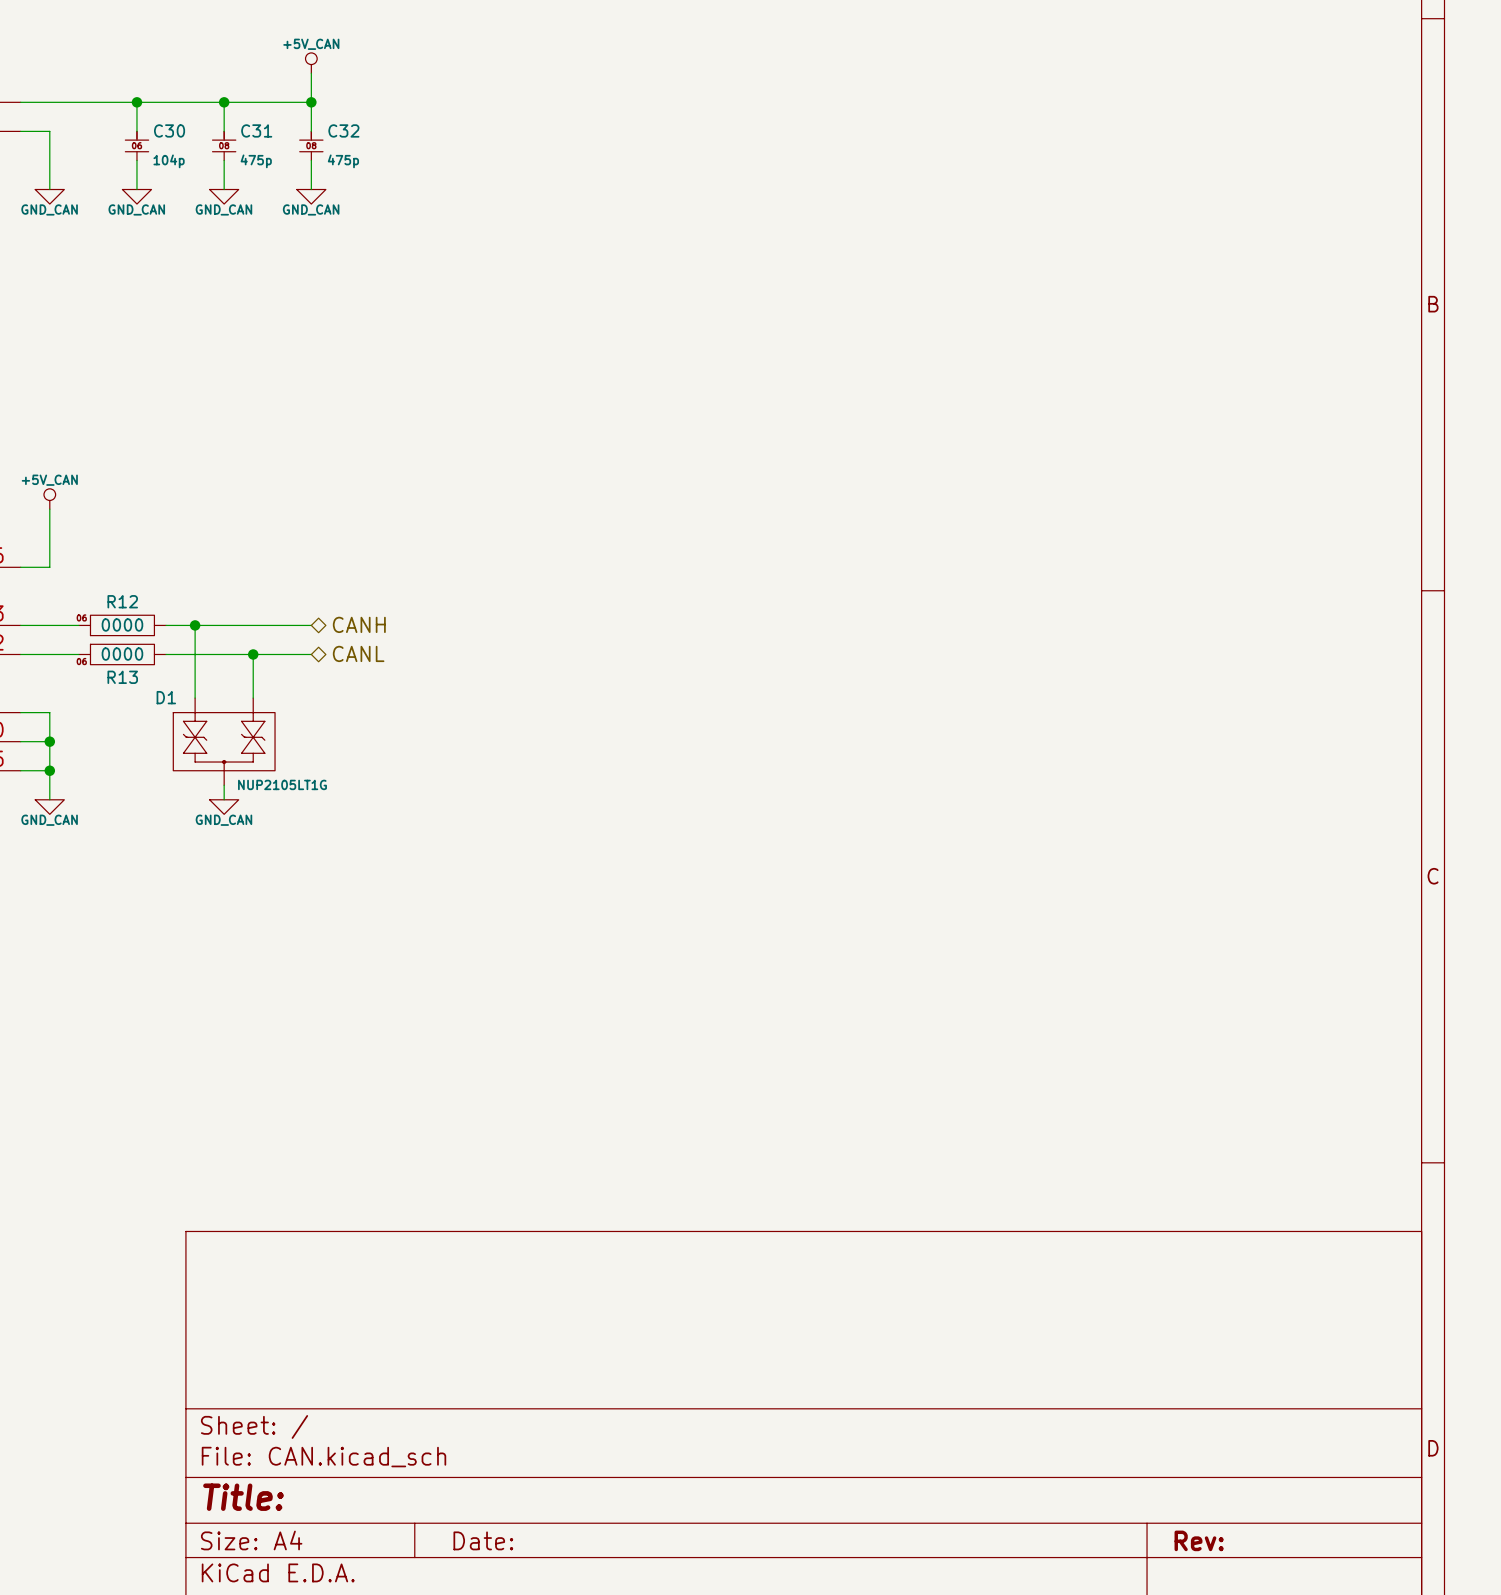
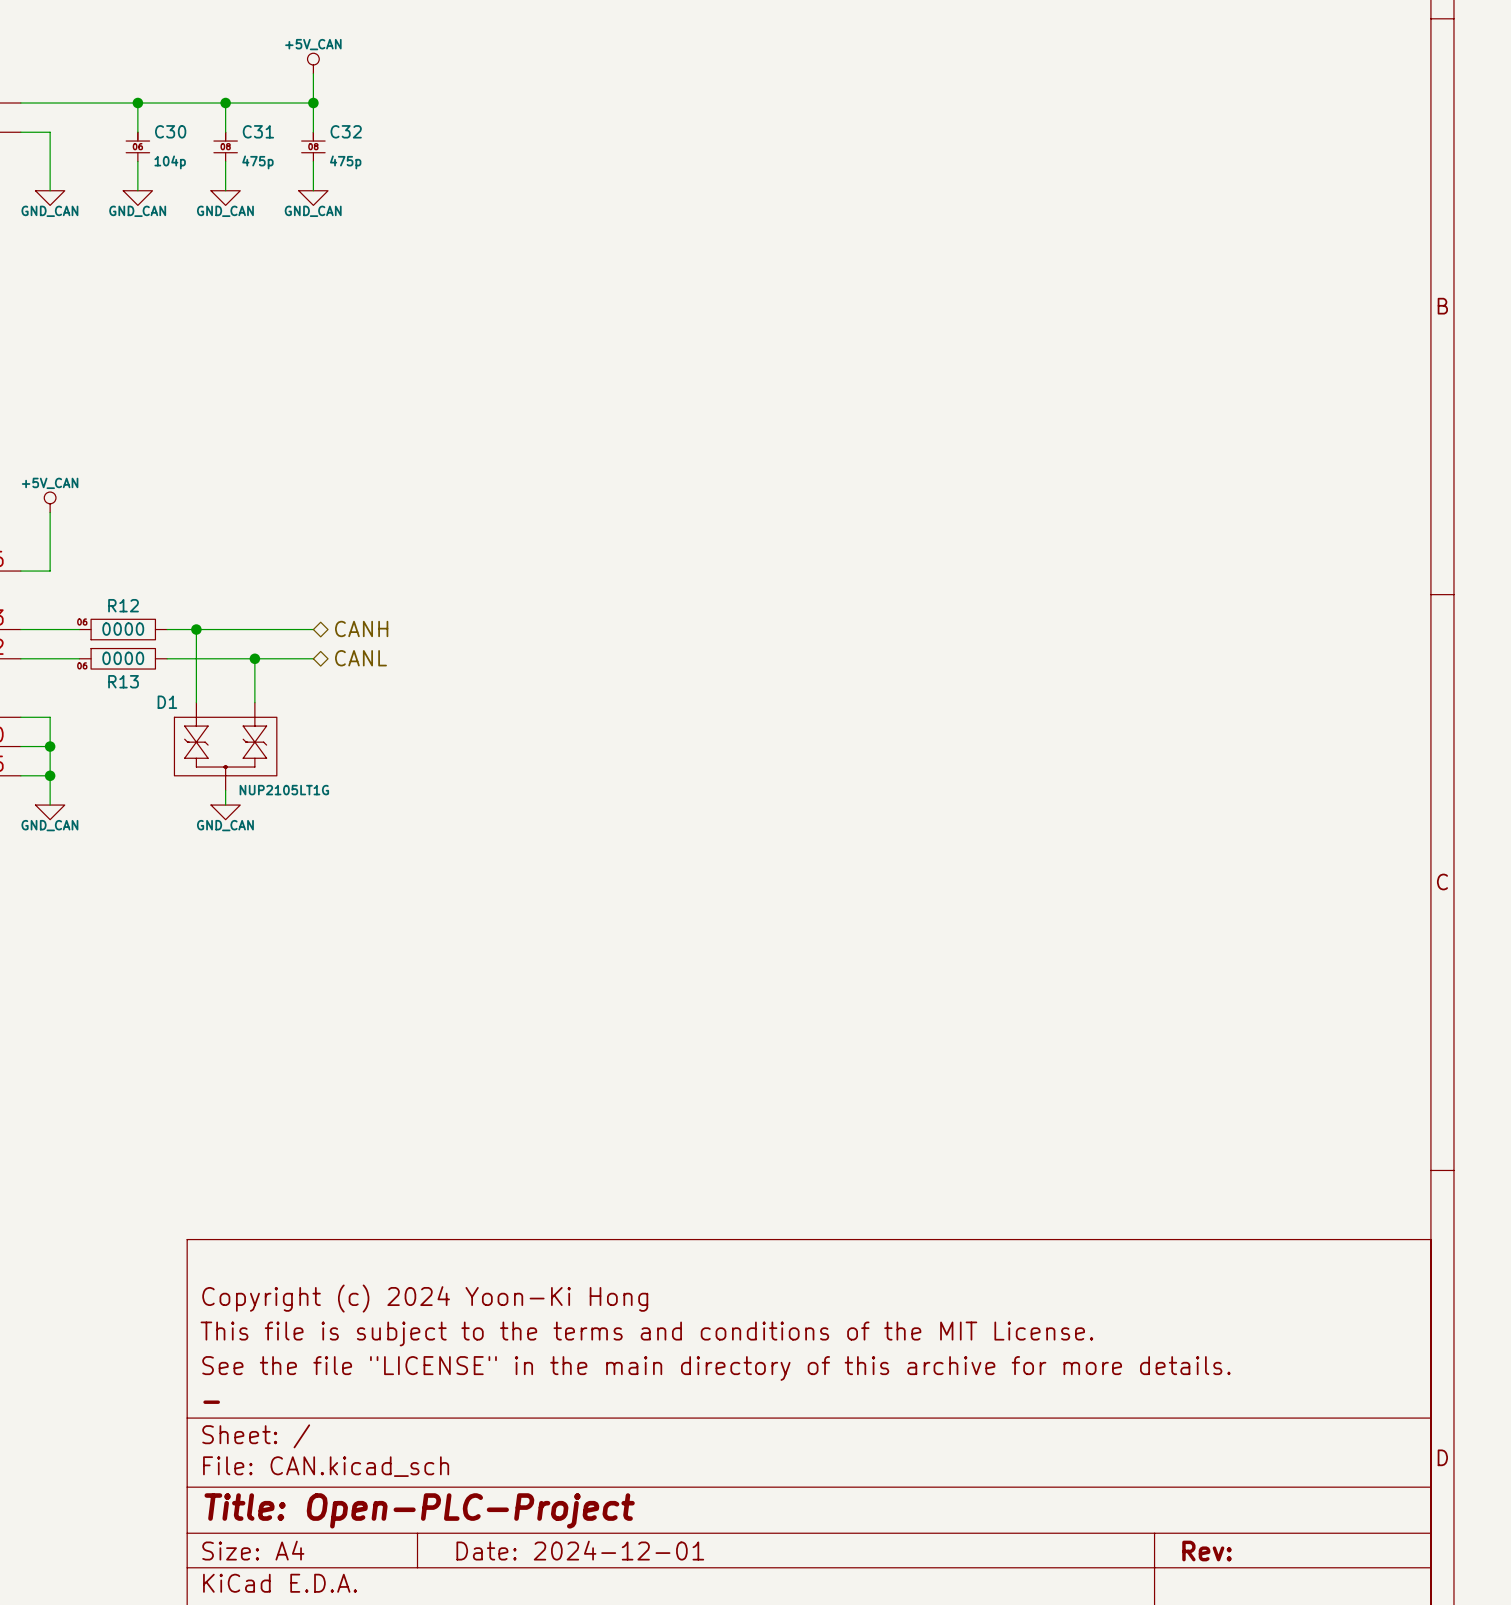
title block: none -> Copyright (c) 2024 Yoon-Ki Hong (425, 1298)
title block: none -> This file is subject to the terms and conditions of the MIT License. (646, 1333)
title block: none -> See the file "LICENSE" in the main directory of this archive for more details. (716, 1368)
title block: none -> - (211, 1402)
title block: Title: (243, 1497) -> Title: Open-PLC-Project (419, 1510)
title block: Date: (483, 1540) -> Date: 2024-12-01 (580, 1550)

